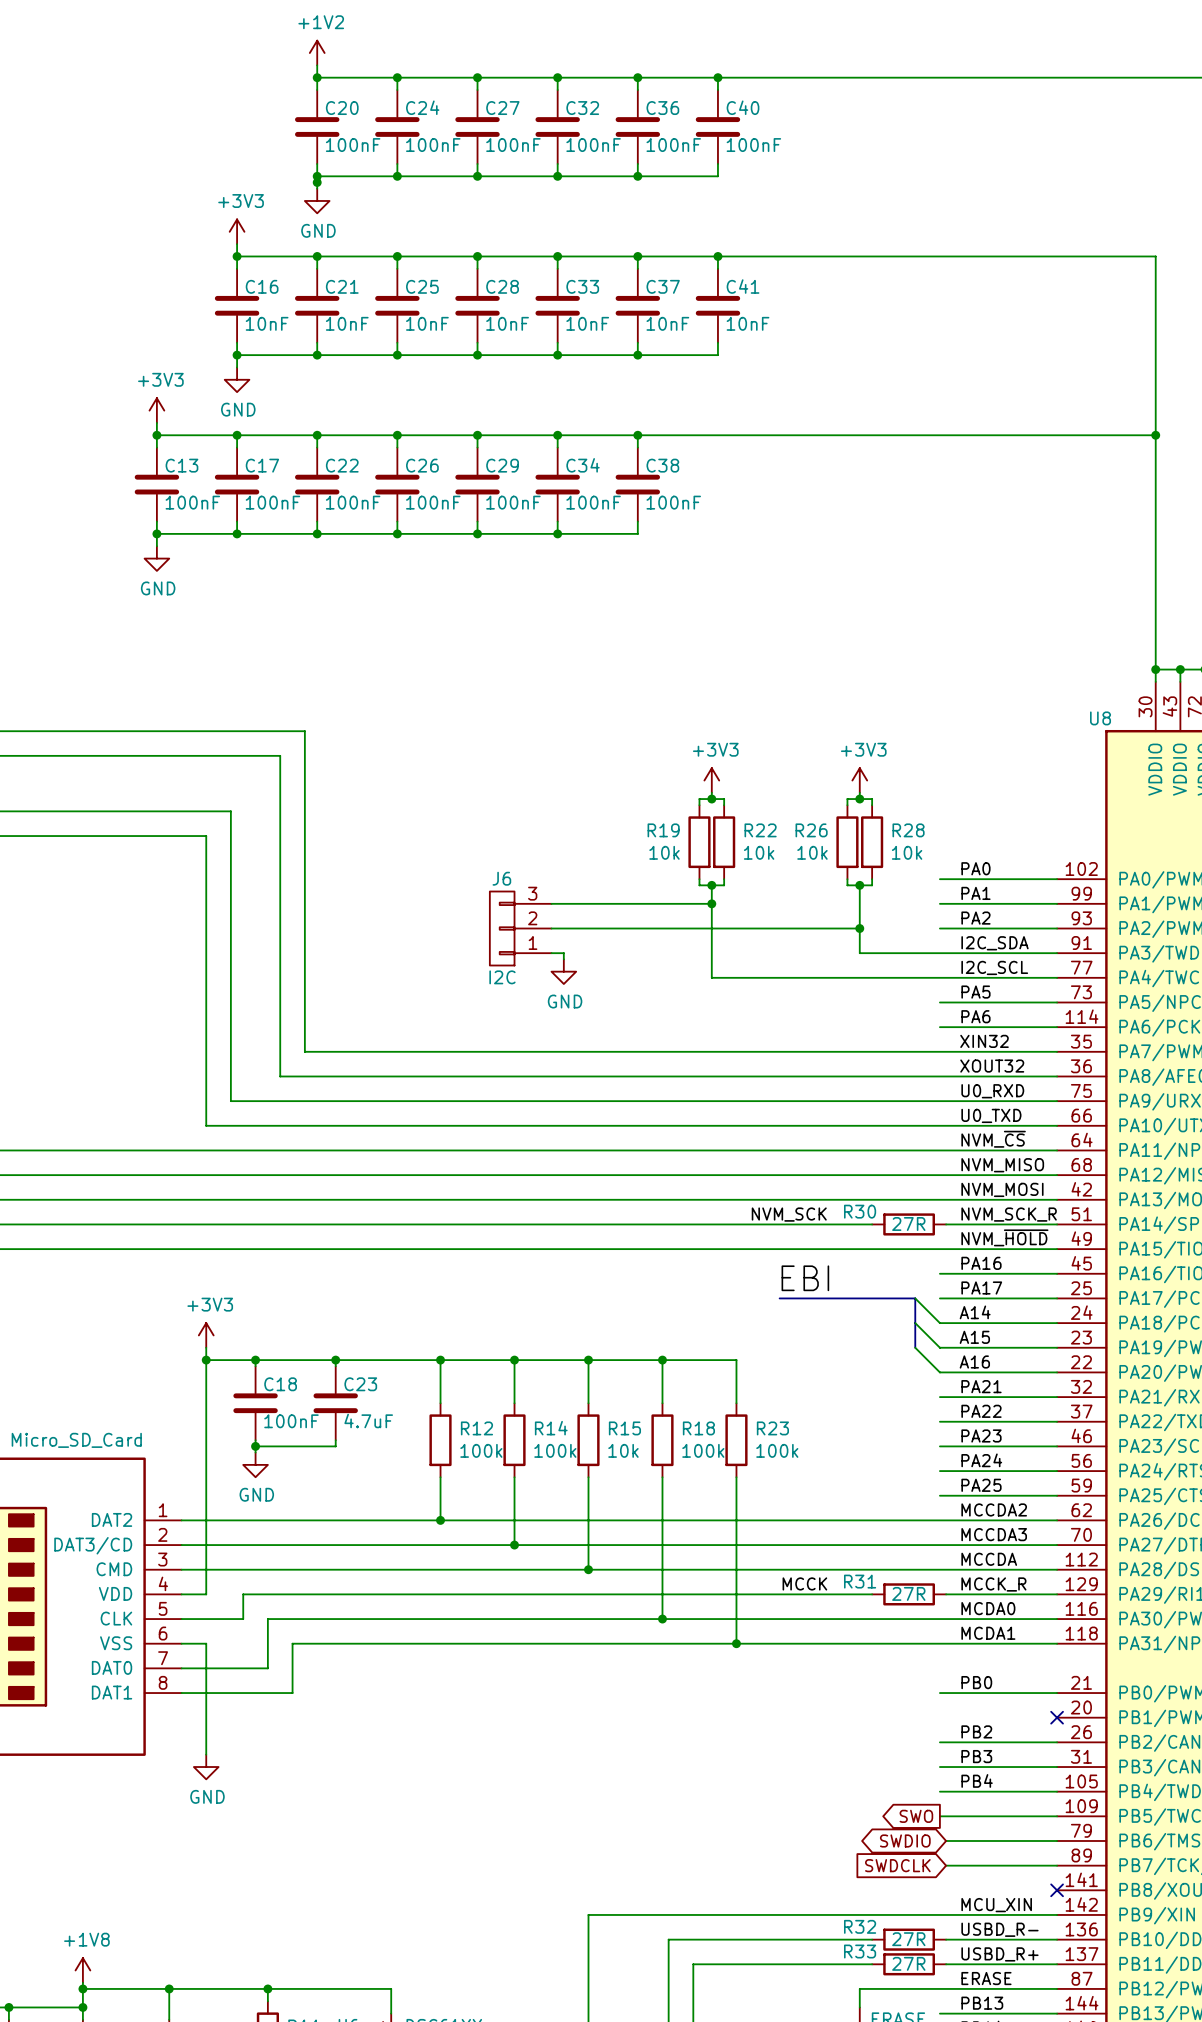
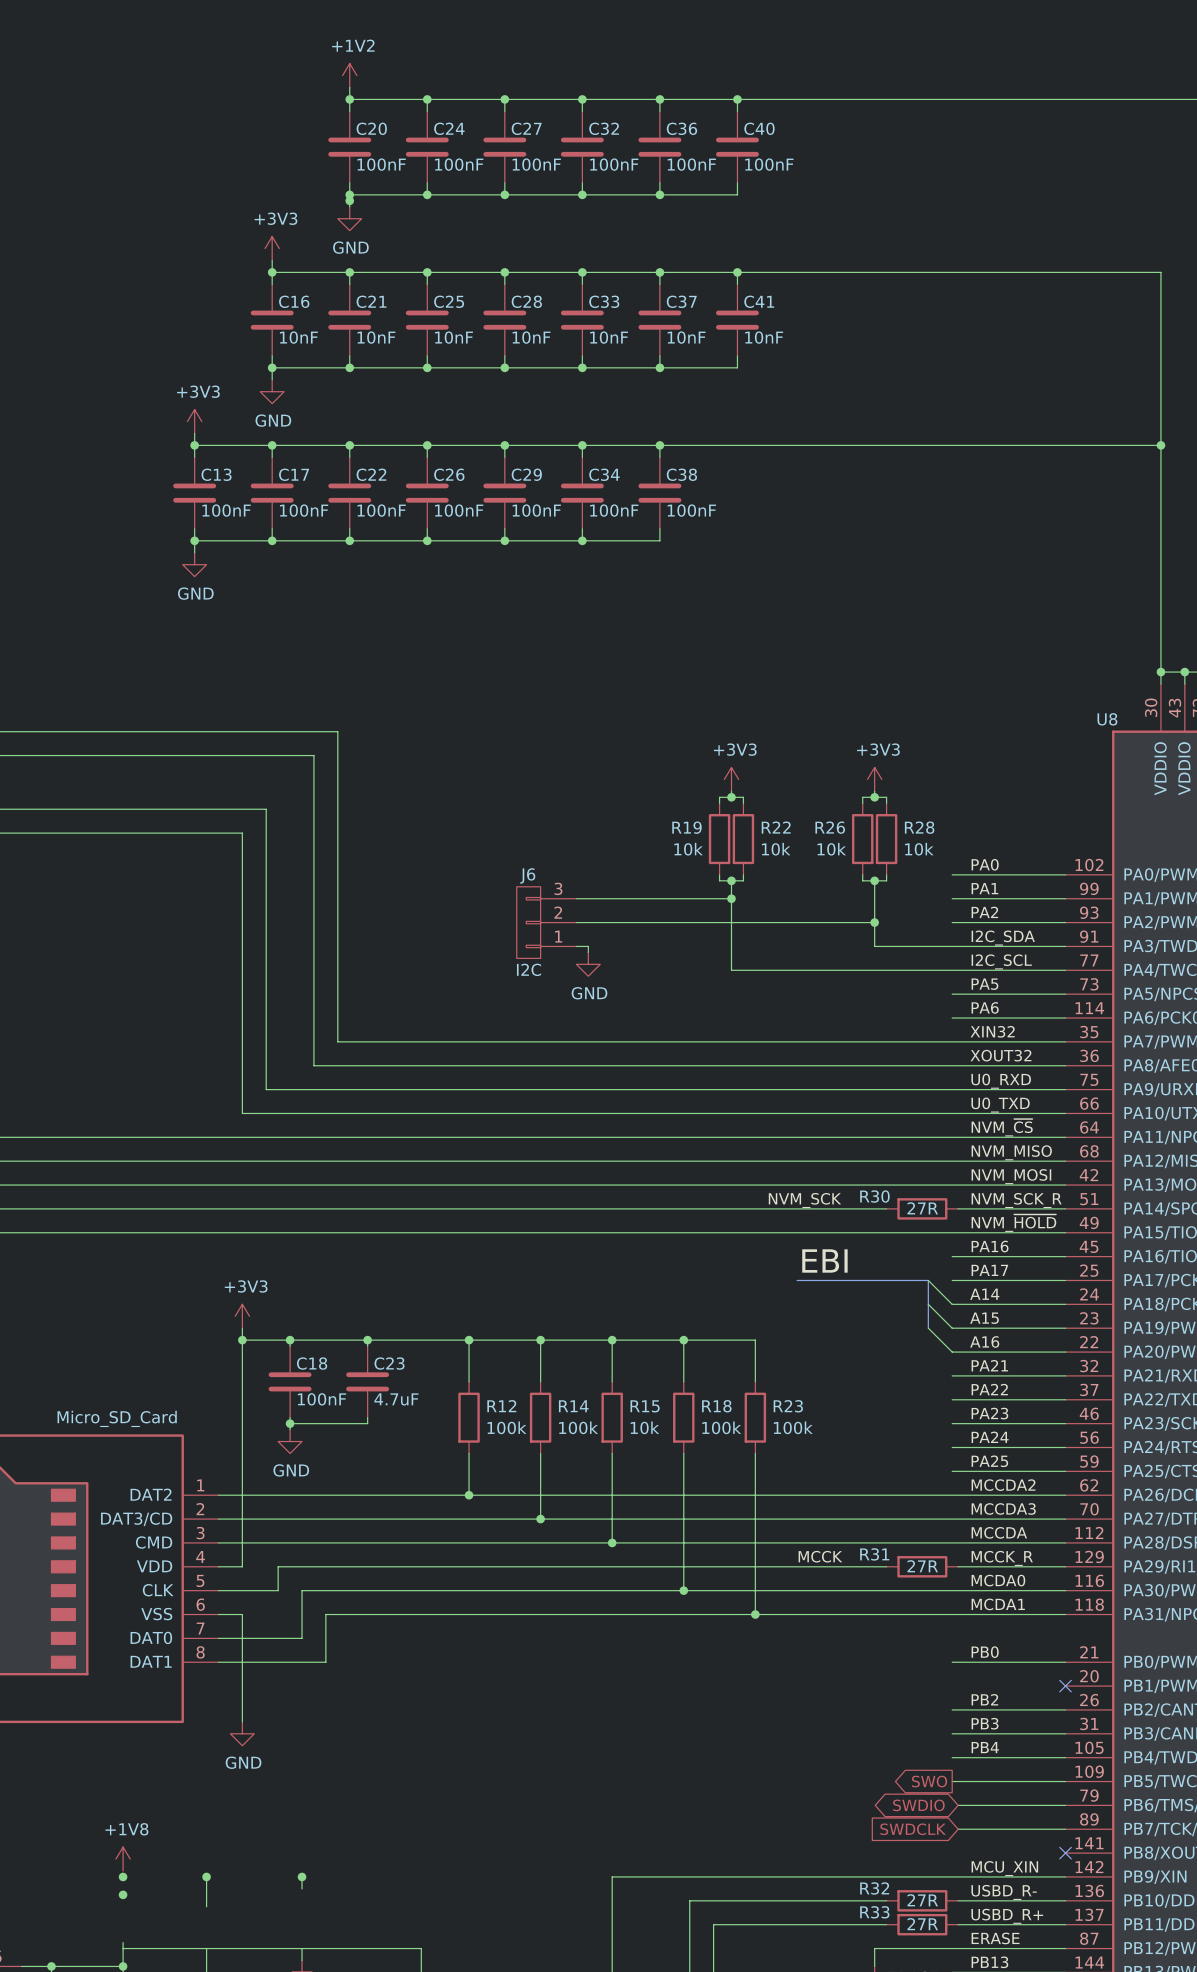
junction: none -> (123, 1876)
wire: none -> (206, 1876) (206, 1906)
junction: none -> (206, 1876)
wire: none -> (302, 1876) (302, 1888)
junction: none -> (302, 1876)
junction: none -> (123, 1894)
power symbol position: +1V8 (82, 1970) -> +1V8 (123, 1859)
junction: (82, 1988) -> none
junction: (169, 1988) -> none
junction: (267, 1988) -> none

